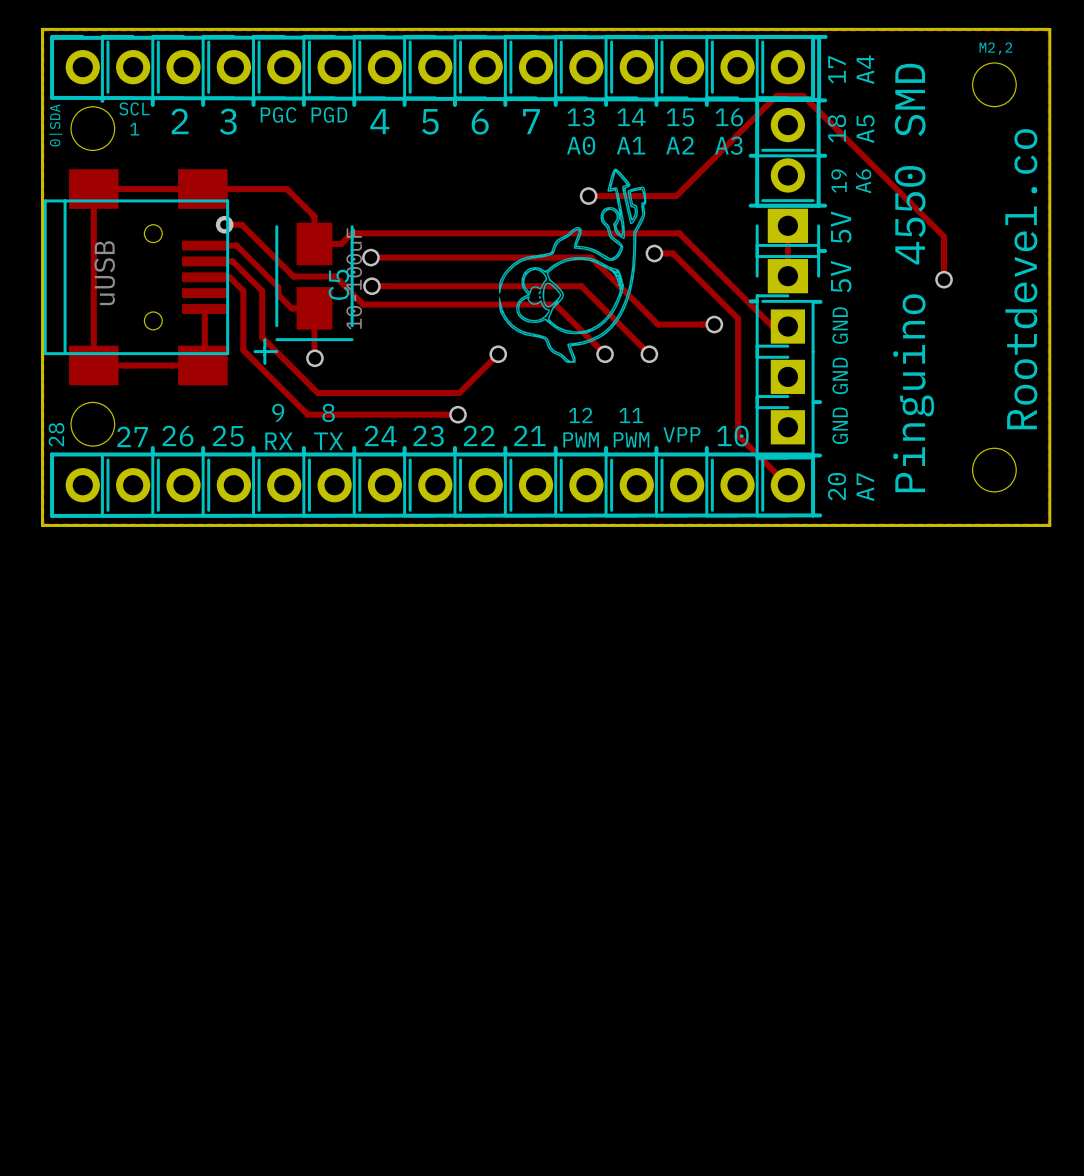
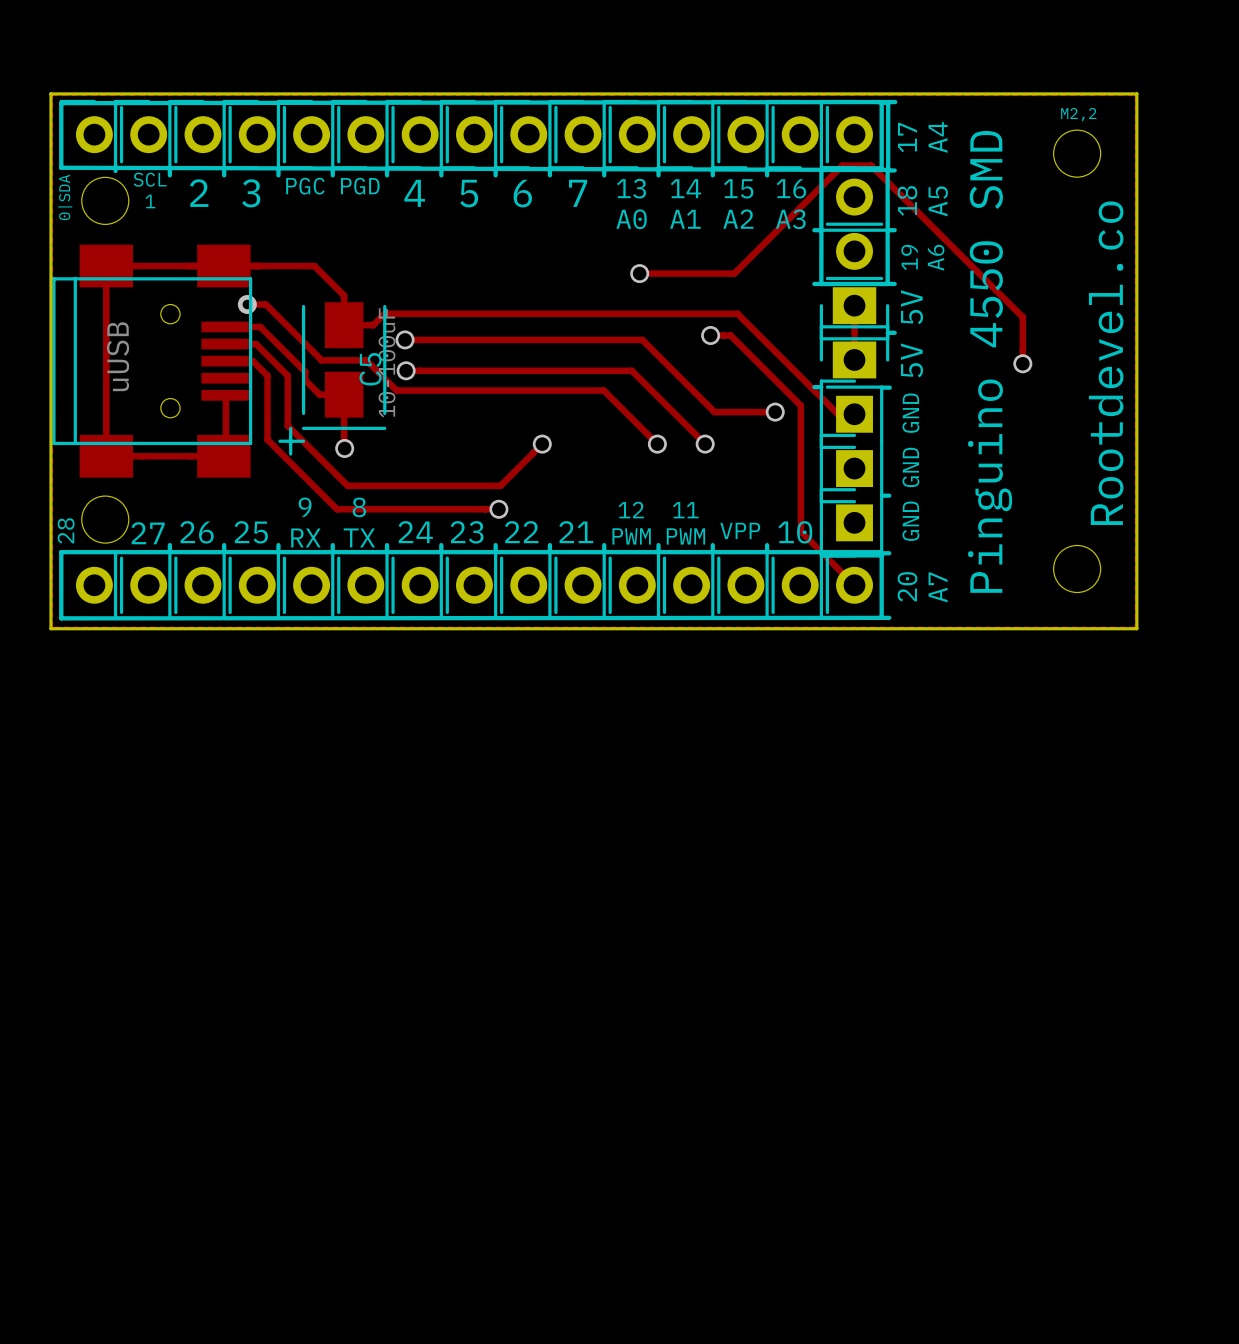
drawing: [498, 168, 647, 363] -> none

